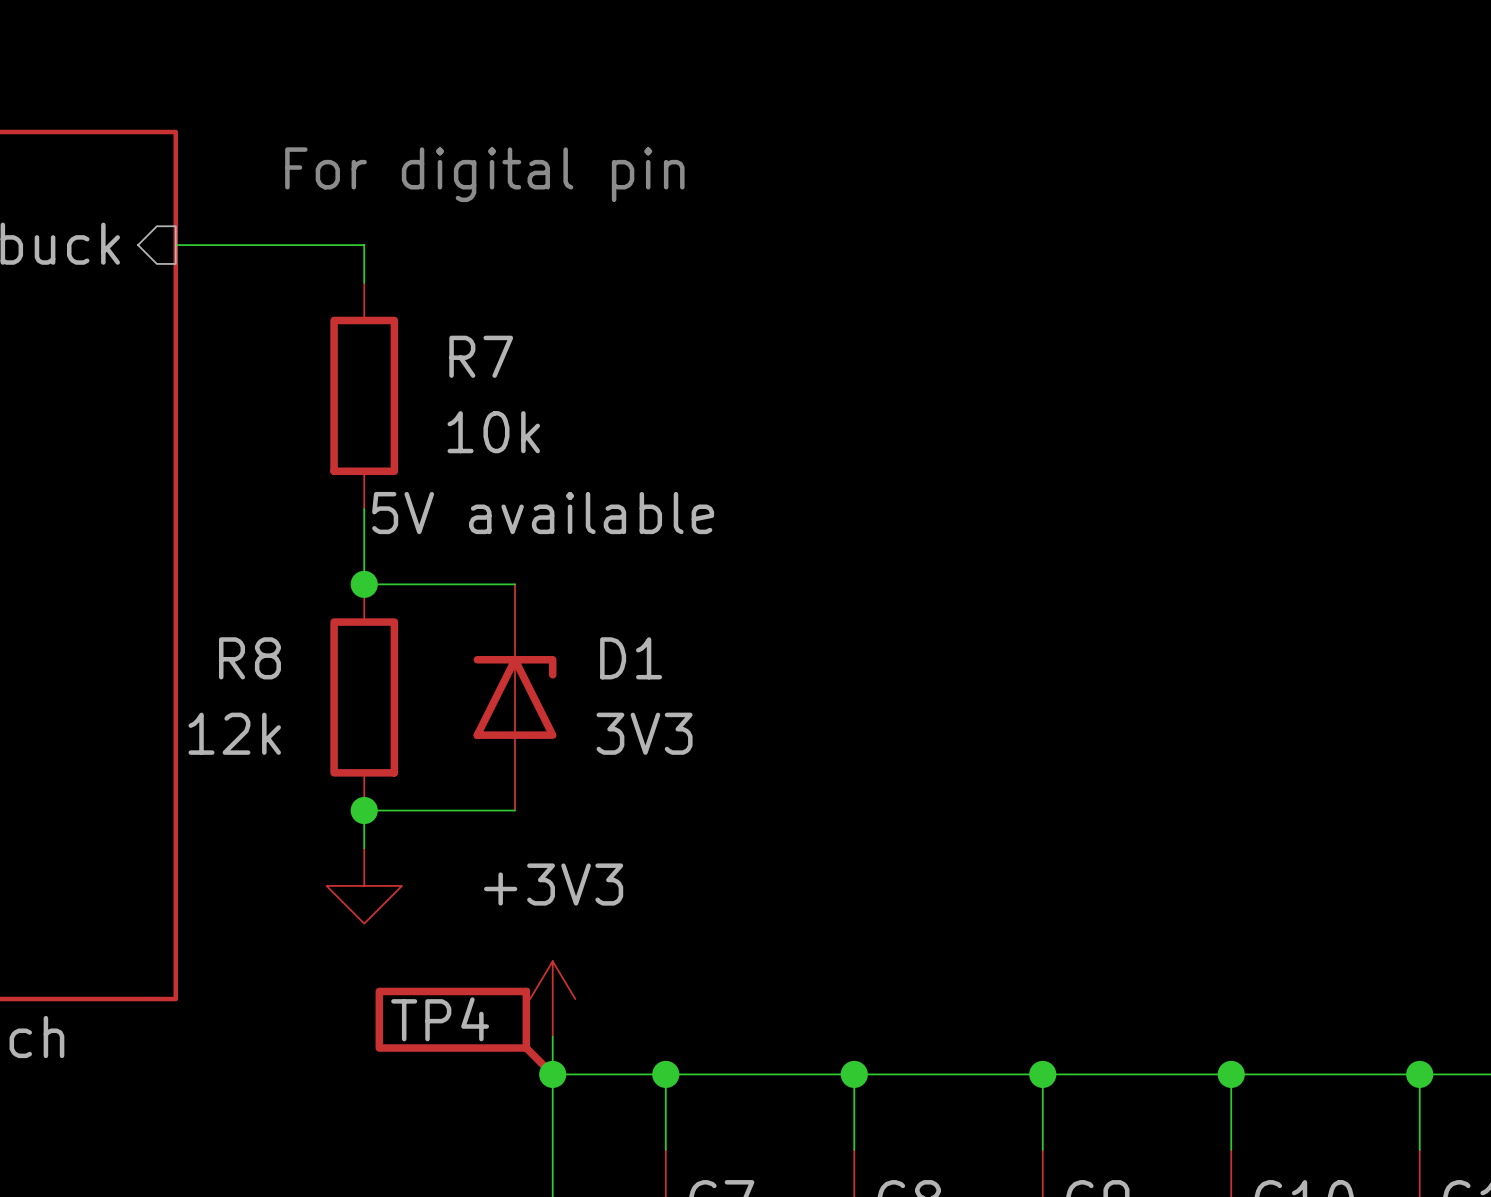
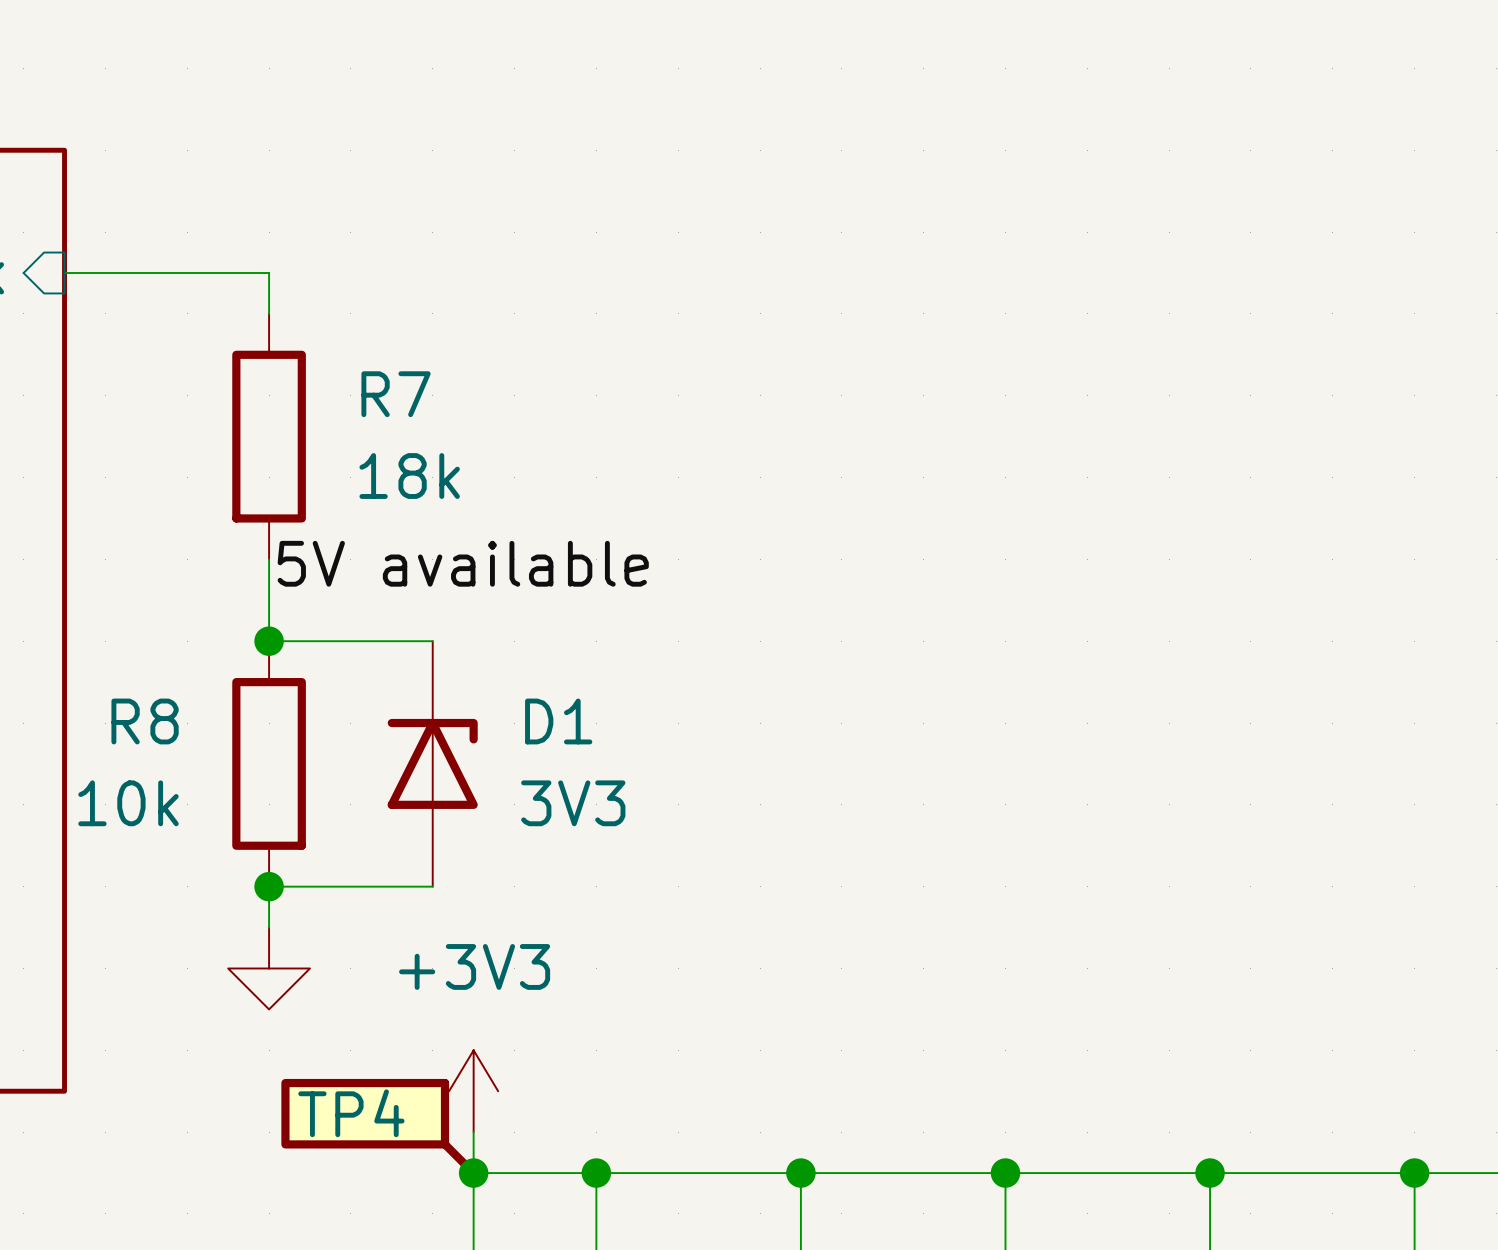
text: For digital pin (484, 174) -> none
R7 value: 10k (493, 432) -> 18k (409, 476)
R8 value: 12k (234, 733) -> 10k (128, 803)

